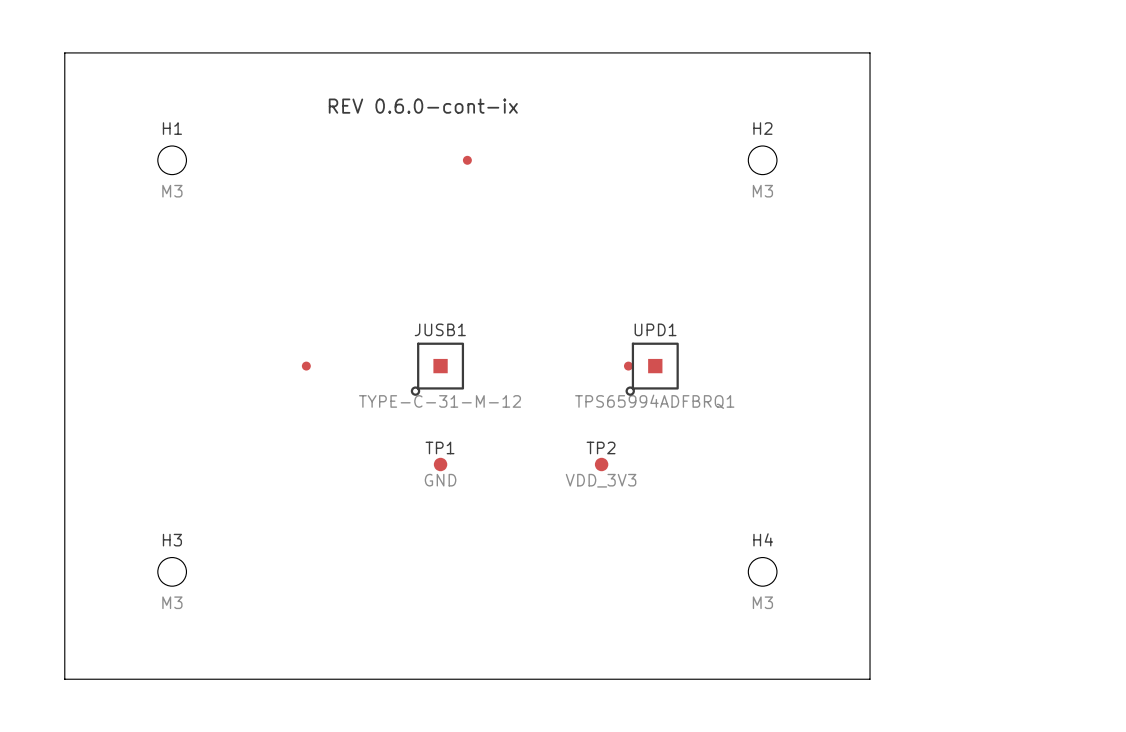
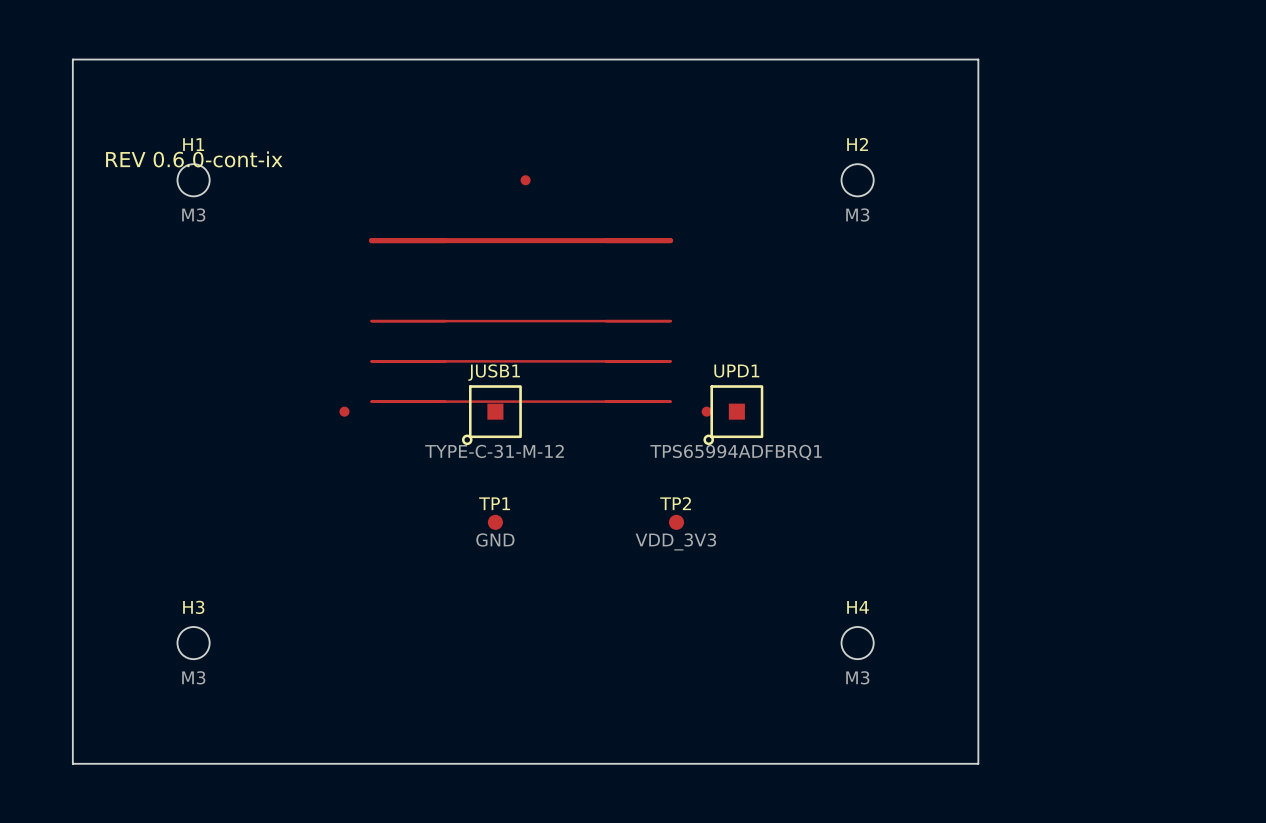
text: REV 0.6.0-cont-ix (423, 106) -> none
text: none -> REV 0.6.0-cont-ix (194, 159)
track: none -> (371, 240) (670, 240)
track: none -> (371, 321) (670, 321)
track: none -> (371, 361) (670, 361)
track: none -> (371, 401) (670, 401)

